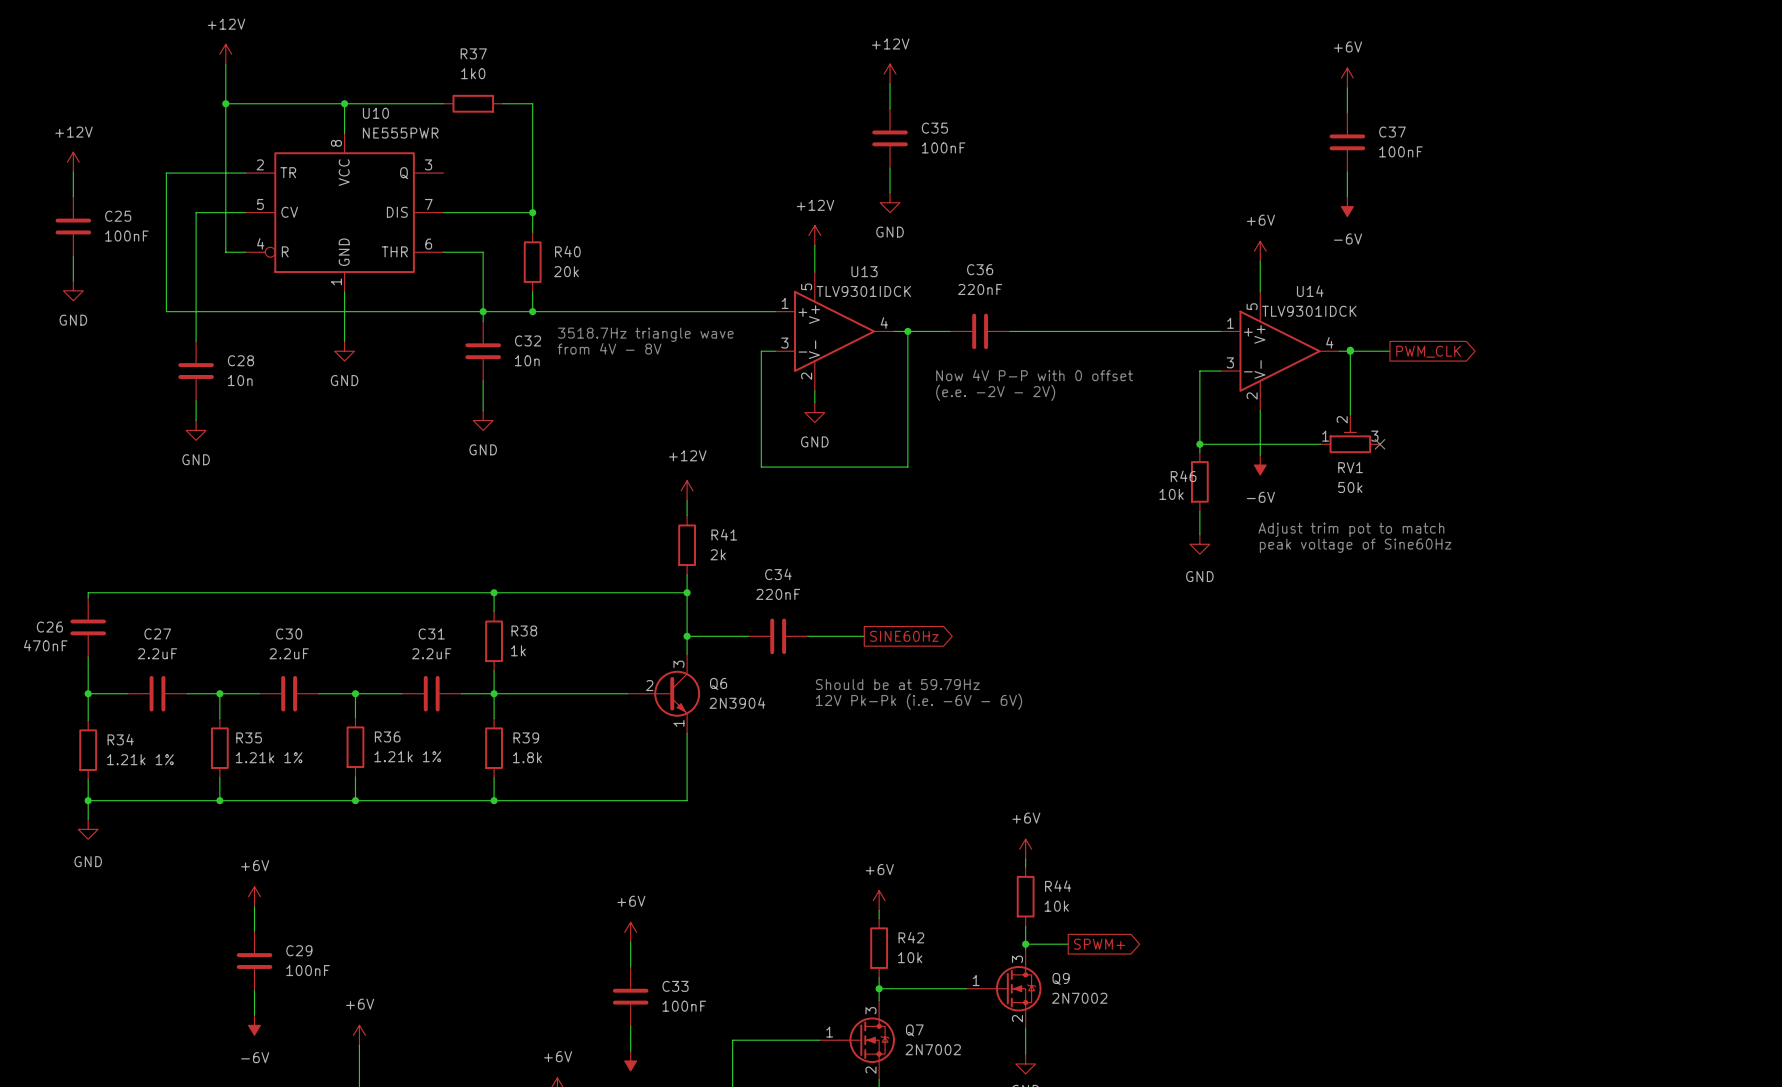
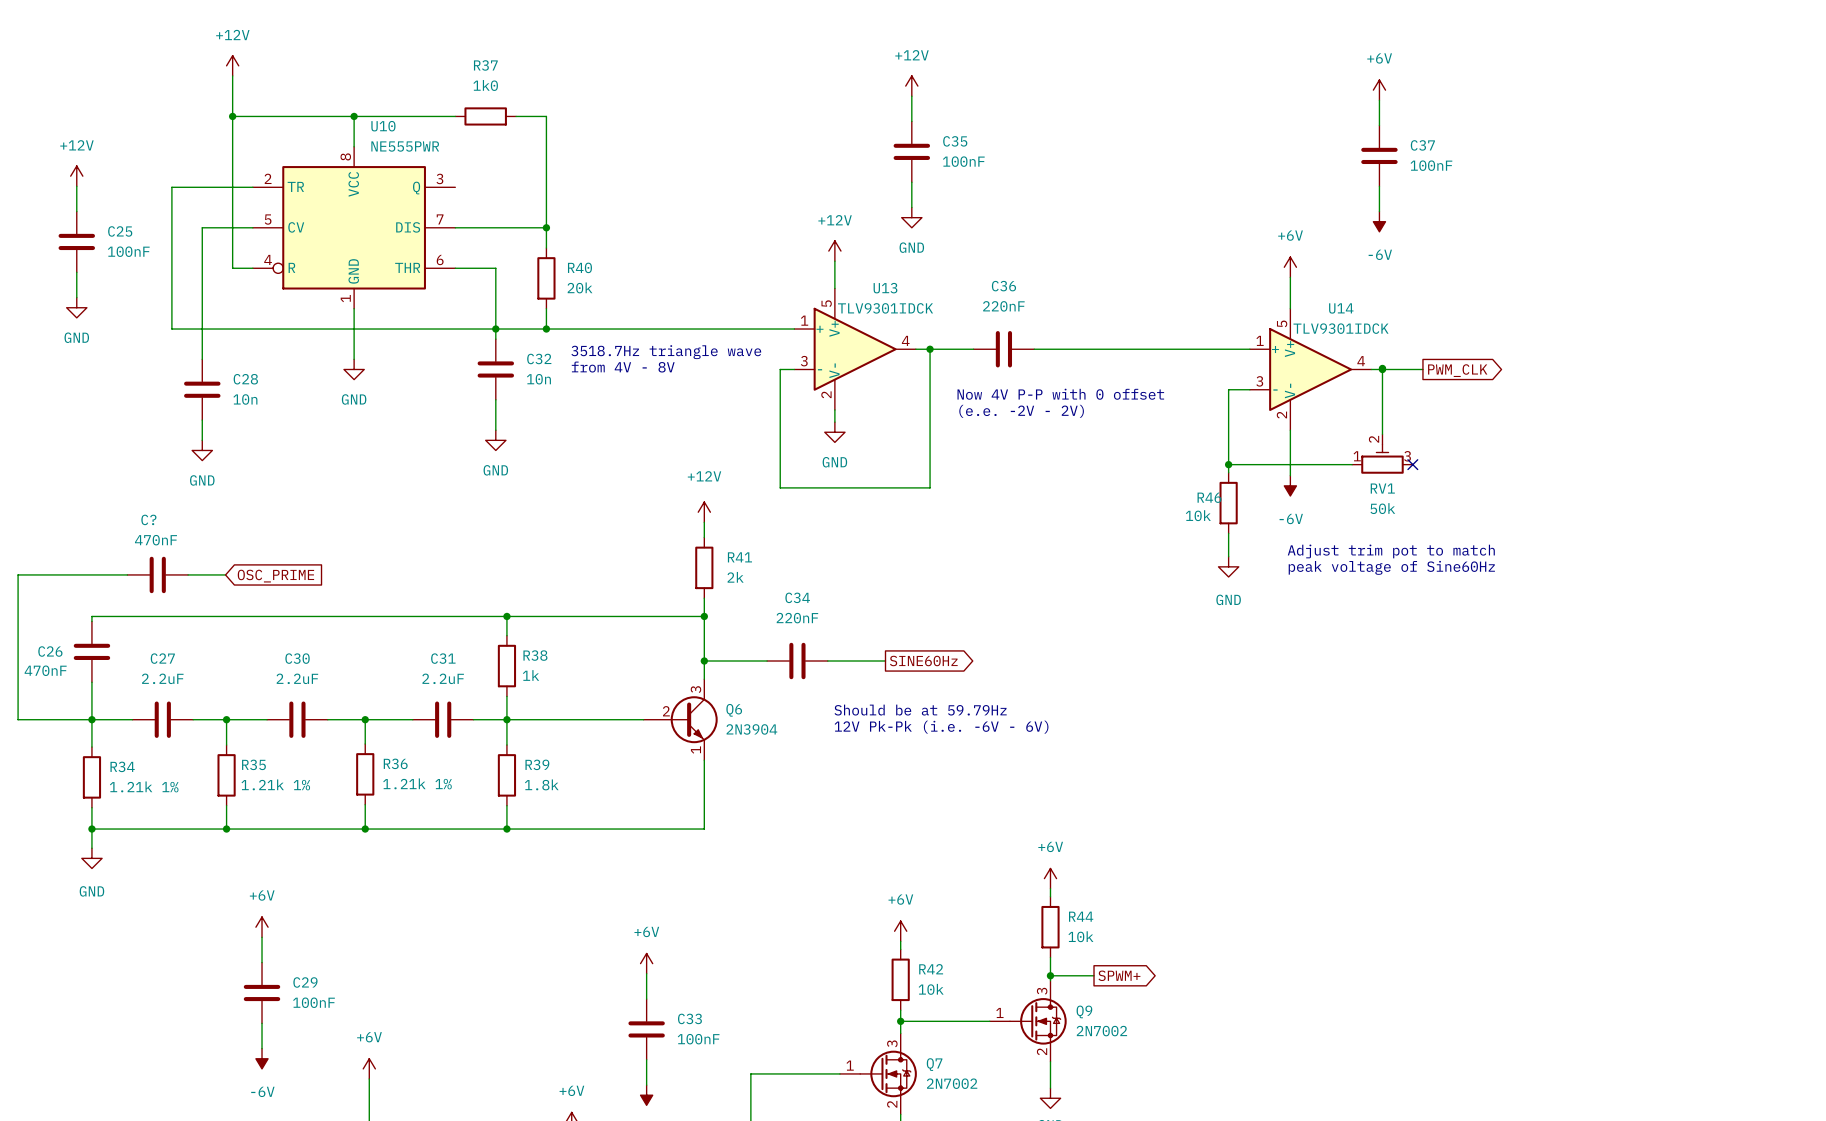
wire: none -> (127, 574) (18, 574) (18, 719) (91, 719)
C?: none -> 470nF (157, 574)
wire: none -> (188, 574) (225, 574)
global label: none -> OSC_PRIME (275, 576)

